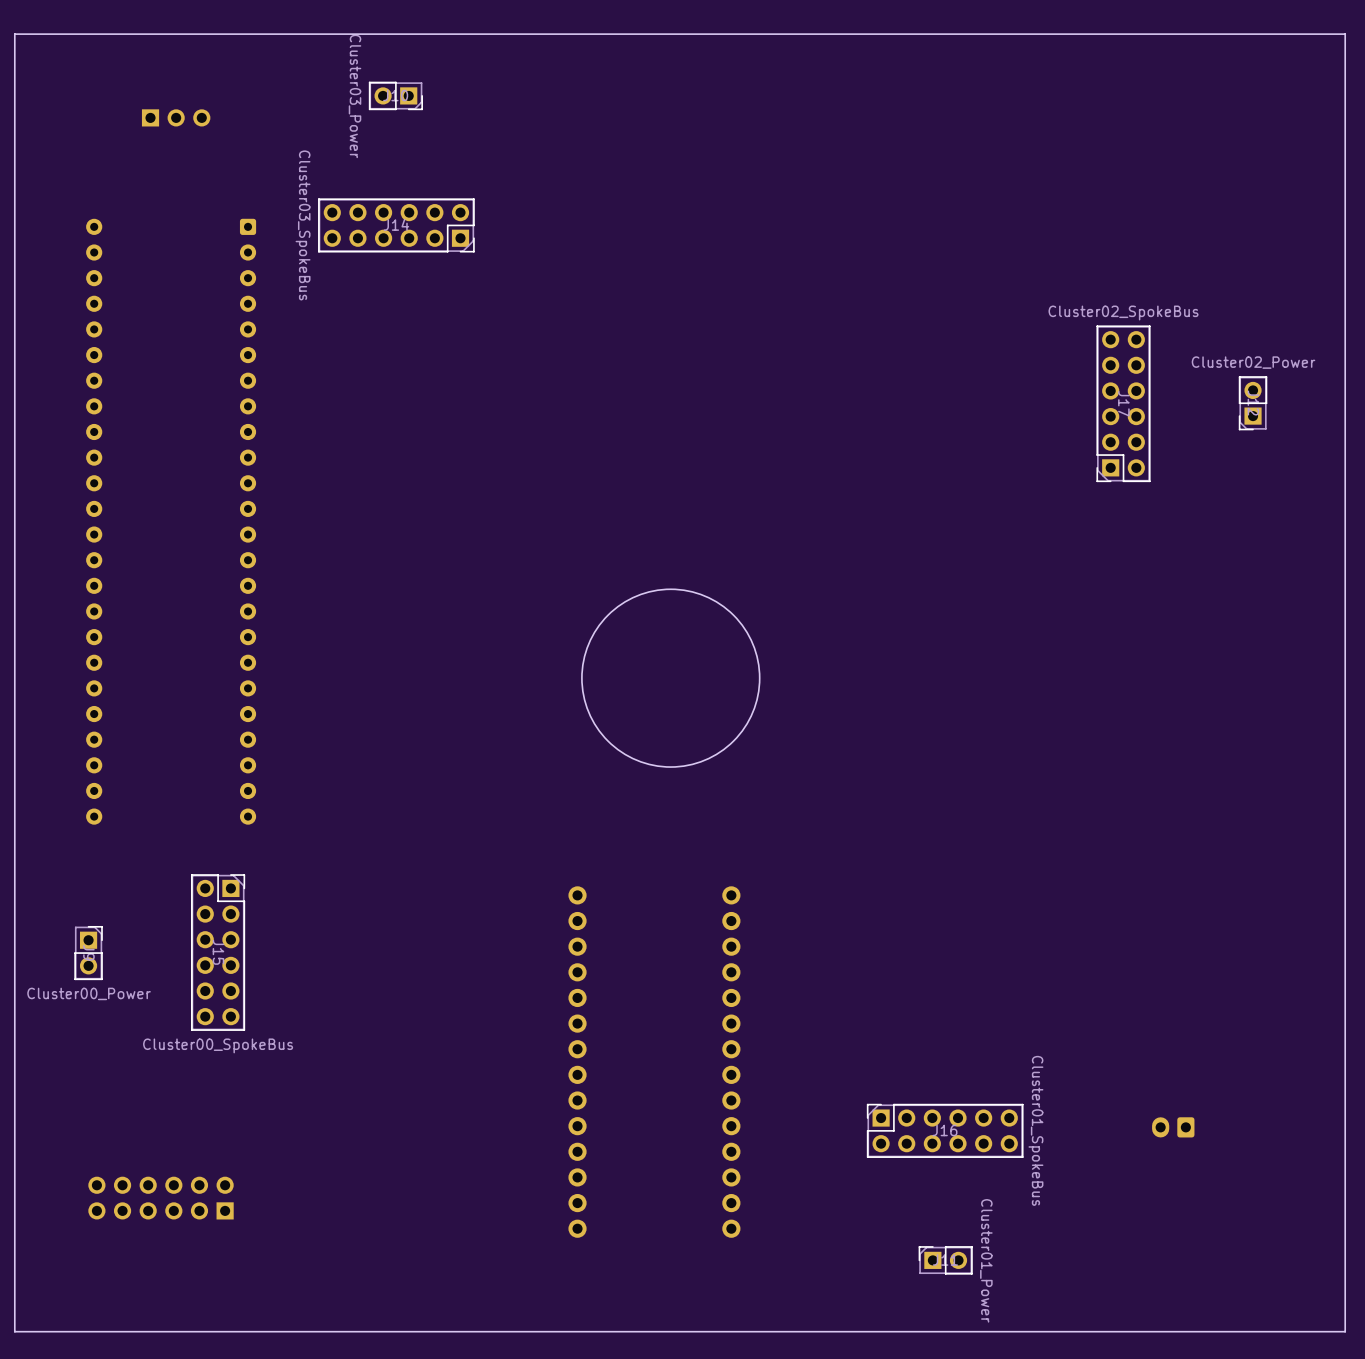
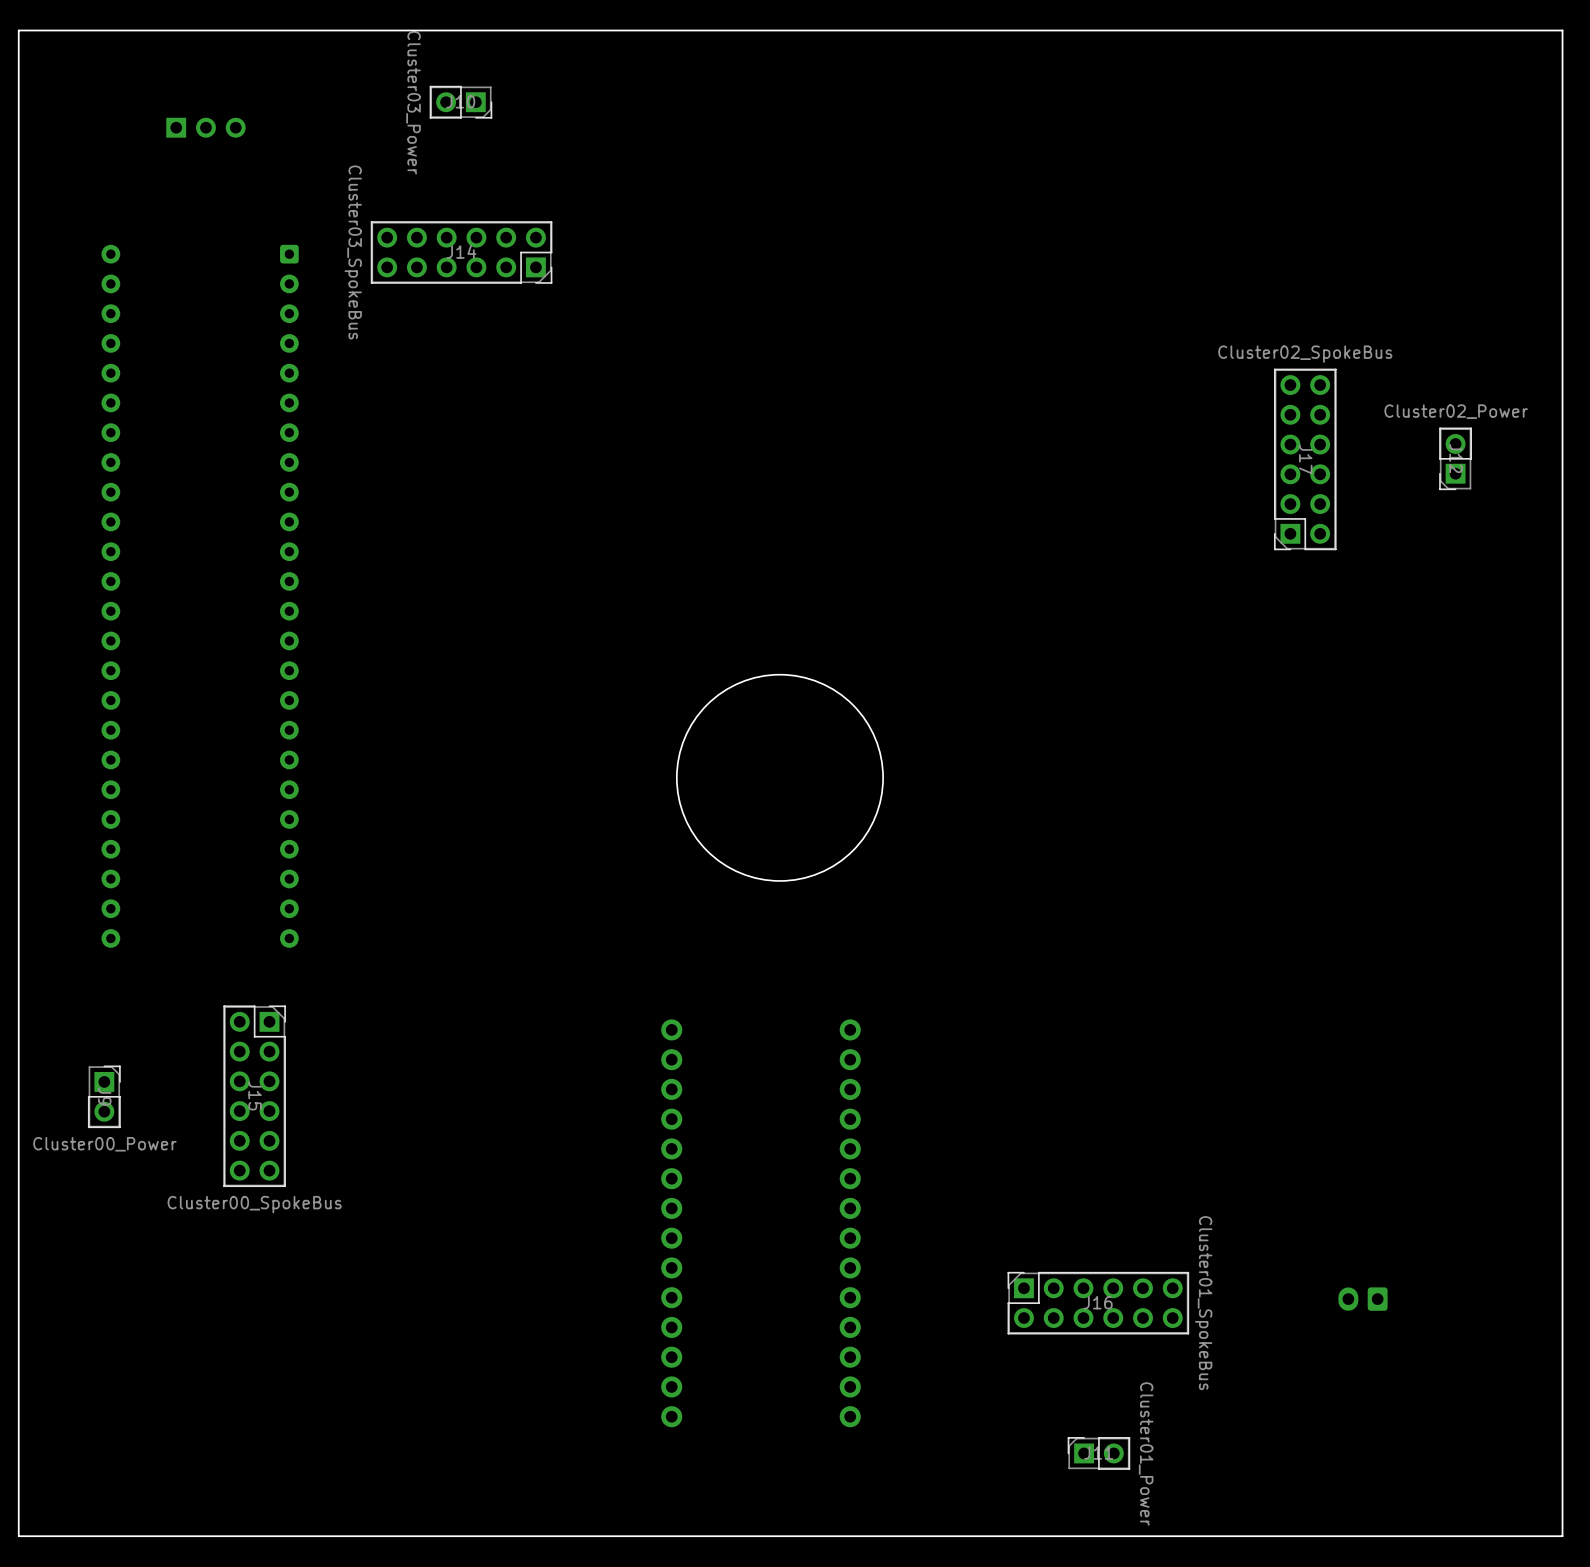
part: (161, 1198) -> none

